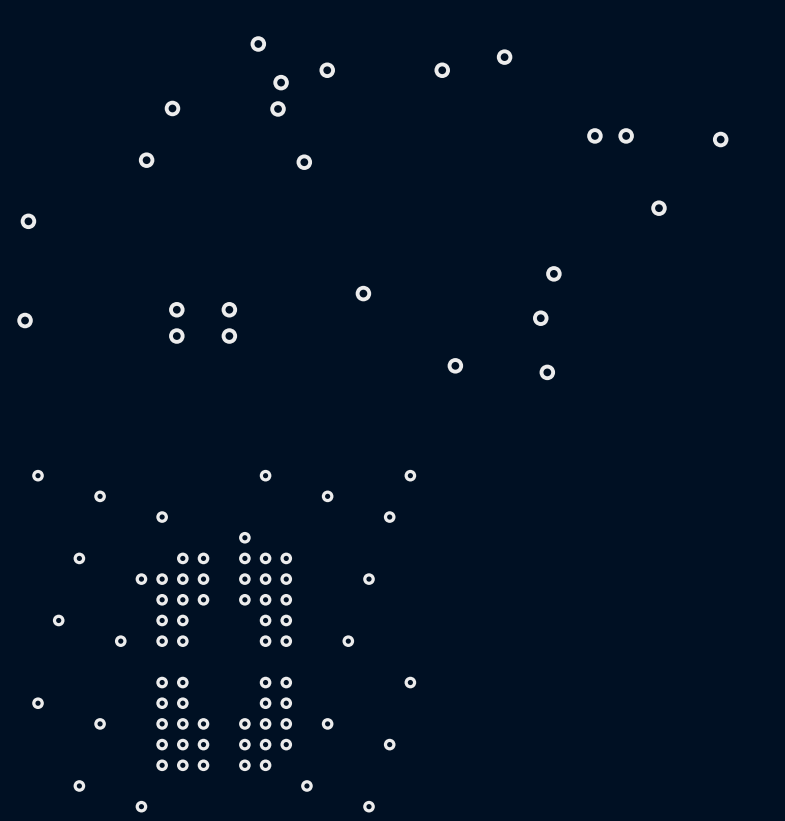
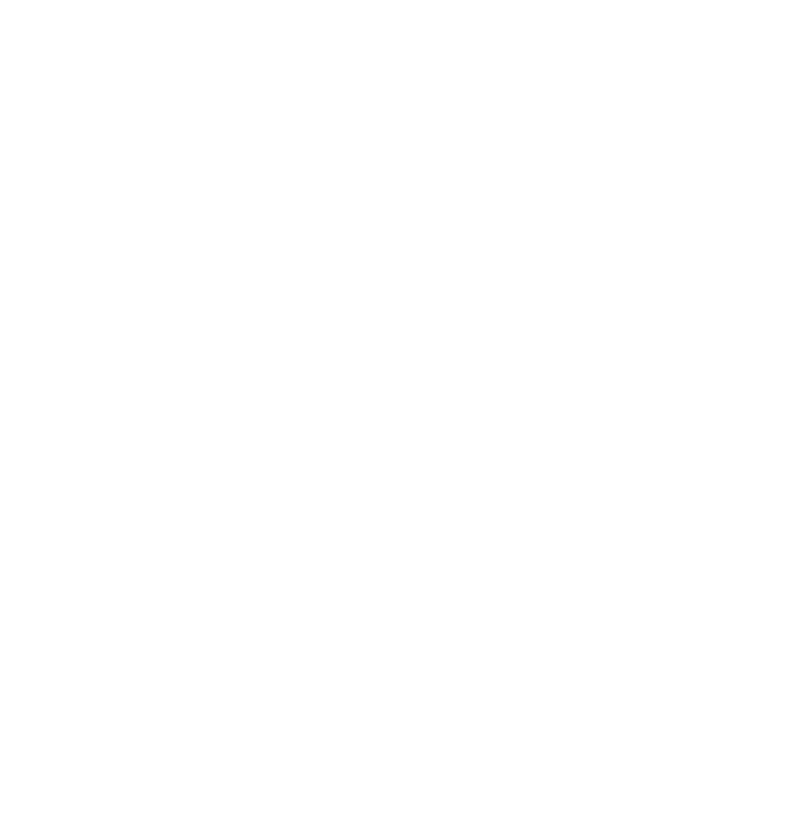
via: (258, 43) -> none
via: (504, 57) -> none
via: (327, 70) -> none
via: (442, 70) -> none
via: (281, 82) -> none
via: (172, 108) -> none
via: (278, 108) -> none
via: (594, 135) -> none
via: (626, 135) -> none
via: (720, 139) -> none
via: (146, 160) -> none
via: (304, 162) -> none
via: (658, 208) -> none
via: (28, 221) -> none
via: (553, 273) -> none
via: (363, 293) -> none
via: (176, 309) -> none
via: (229, 309) -> none
via: (540, 318) -> none
via: (25, 320) -> none
via: (176, 336) -> none
via: (229, 336) -> none
via: (455, 365) -> none
via: (547, 372) -> none
via: (38, 475) -> none
via: (265, 475) -> none
via: (410, 475) -> none
via: (100, 496) -> none
via: (327, 496) -> none
via: (162, 517) -> none
via: (389, 517) -> none
via: (244, 537) -> none
via: (79, 558) -> none
via: (182, 558) -> none
via: (203, 558) -> none
via: (244, 558) -> none
via: (265, 558) -> none
via: (286, 558) -> none
via: (141, 579) -> none
via: (162, 579) -> none
via: (182, 579) -> none
via: (203, 579) -> none
via: (244, 579) -> none
via: (265, 579) -> none
via: (286, 579) -> none
via: (369, 579) -> none
via: (162, 599) -> none
via: (182, 599) -> none
via: (203, 599) -> none
via: (244, 599) -> none
via: (265, 599) -> none
via: (286, 599) -> none
via: (58, 620) -> none
via: (162, 620) -> none
via: (182, 620) -> none
via: (265, 620) -> none
via: (286, 620) -> none
via: (120, 641) -> none
via: (162, 641) -> none
via: (182, 641) -> none
via: (265, 641) -> none
via: (286, 641) -> none
via: (348, 641) -> none
via: (162, 682) -> none
via: (182, 682) -> none
via: (265, 682) -> none
via: (286, 682) -> none
via: (410, 682) -> none
via: (38, 703) -> none
via: (162, 703) -> none
via: (182, 703) -> none
via: (265, 703) -> none
via: (286, 703) -> none
via: (100, 723) -> none
via: (162, 723) -> none
via: (182, 723) -> none
via: (203, 723) -> none
via: (244, 723) -> none
via: (265, 723) -> none
via: (286, 723) -> none
via: (327, 723) -> none
via: (162, 744) -> none
via: (182, 744) -> none
via: (203, 744) -> none
via: (244, 744) -> none
via: (265, 744) -> none
via: (286, 744) -> none
via: (389, 744) -> none
via: (162, 765) -> none
via: (182, 765) -> none
via: (203, 765) -> none
via: (244, 765) -> none
via: (265, 765) -> none
via: (79, 785) -> none
via: (306, 785) -> none
via: (141, 806) -> none
via: (369, 806) -> none

